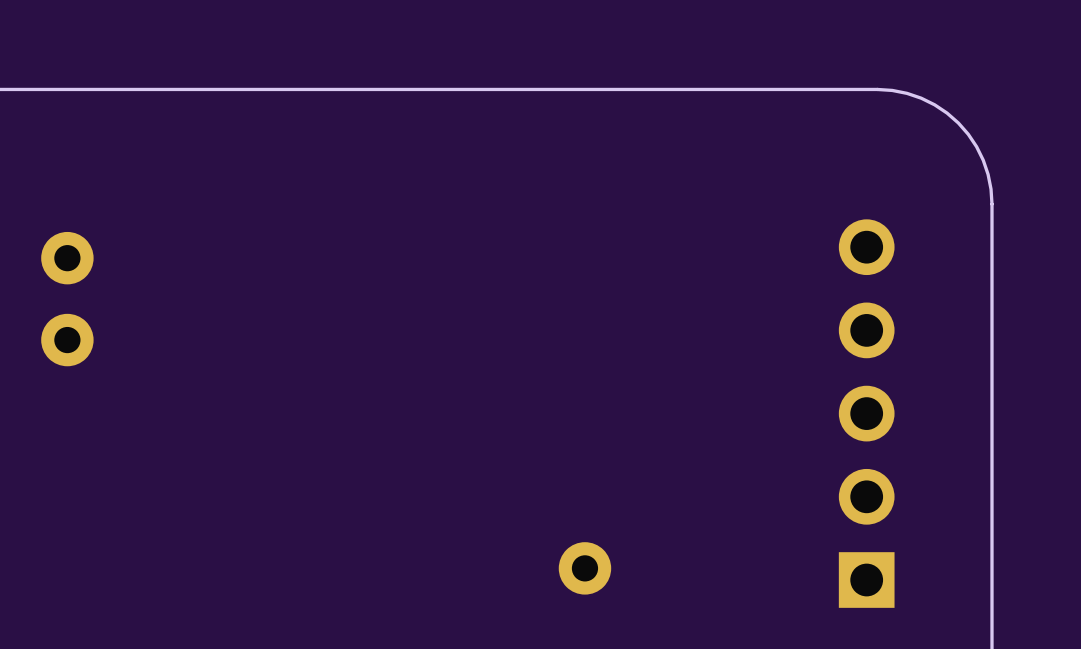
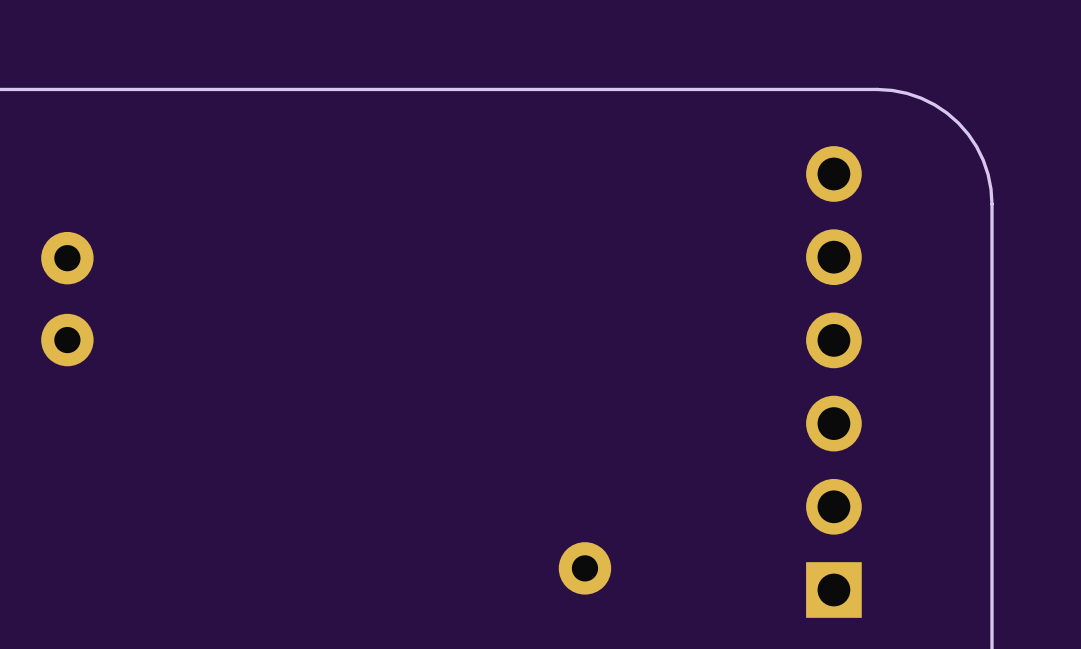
part: none -> (833, 381)
part: (866, 413) -> none

